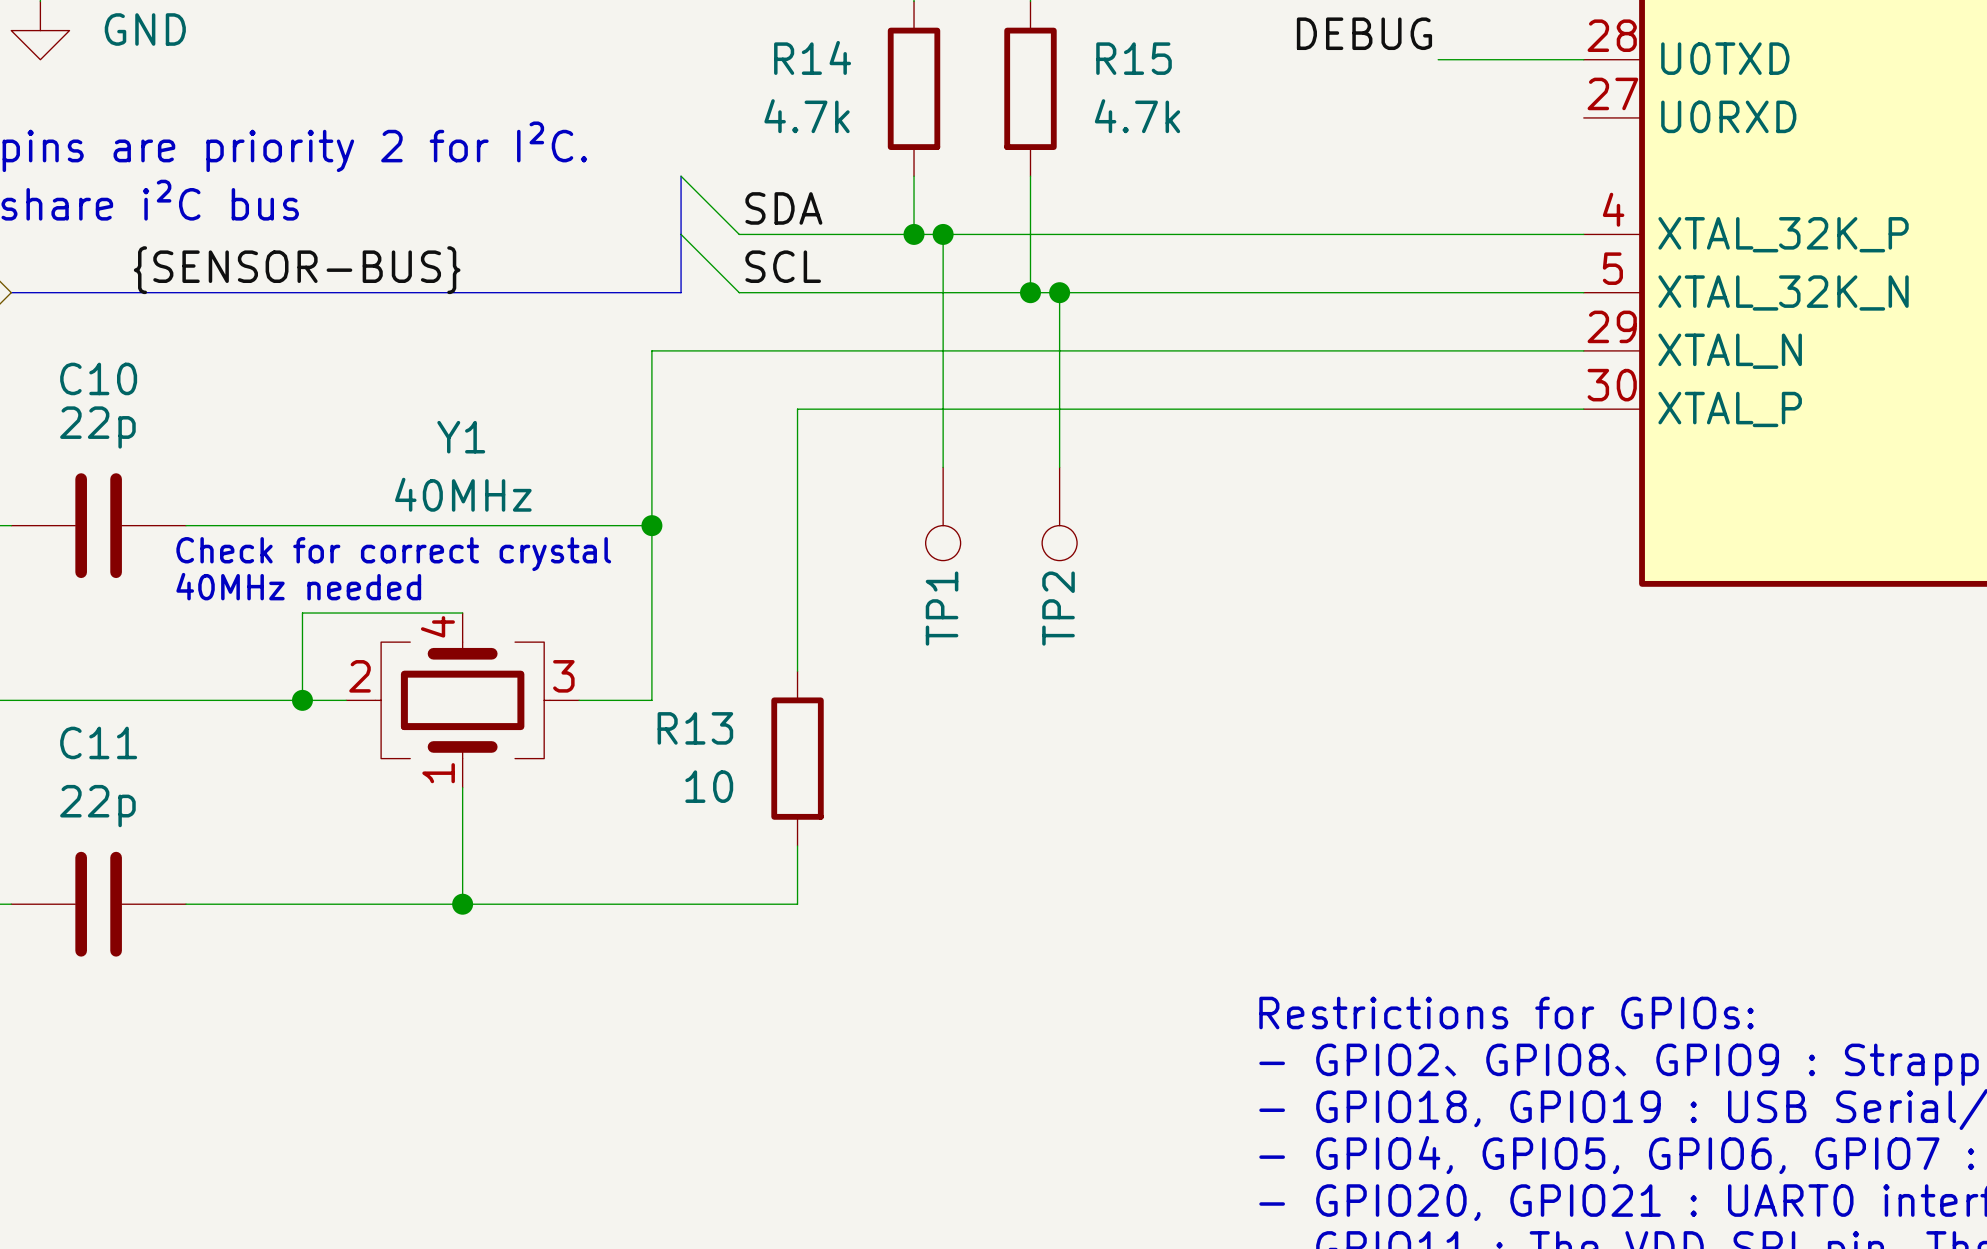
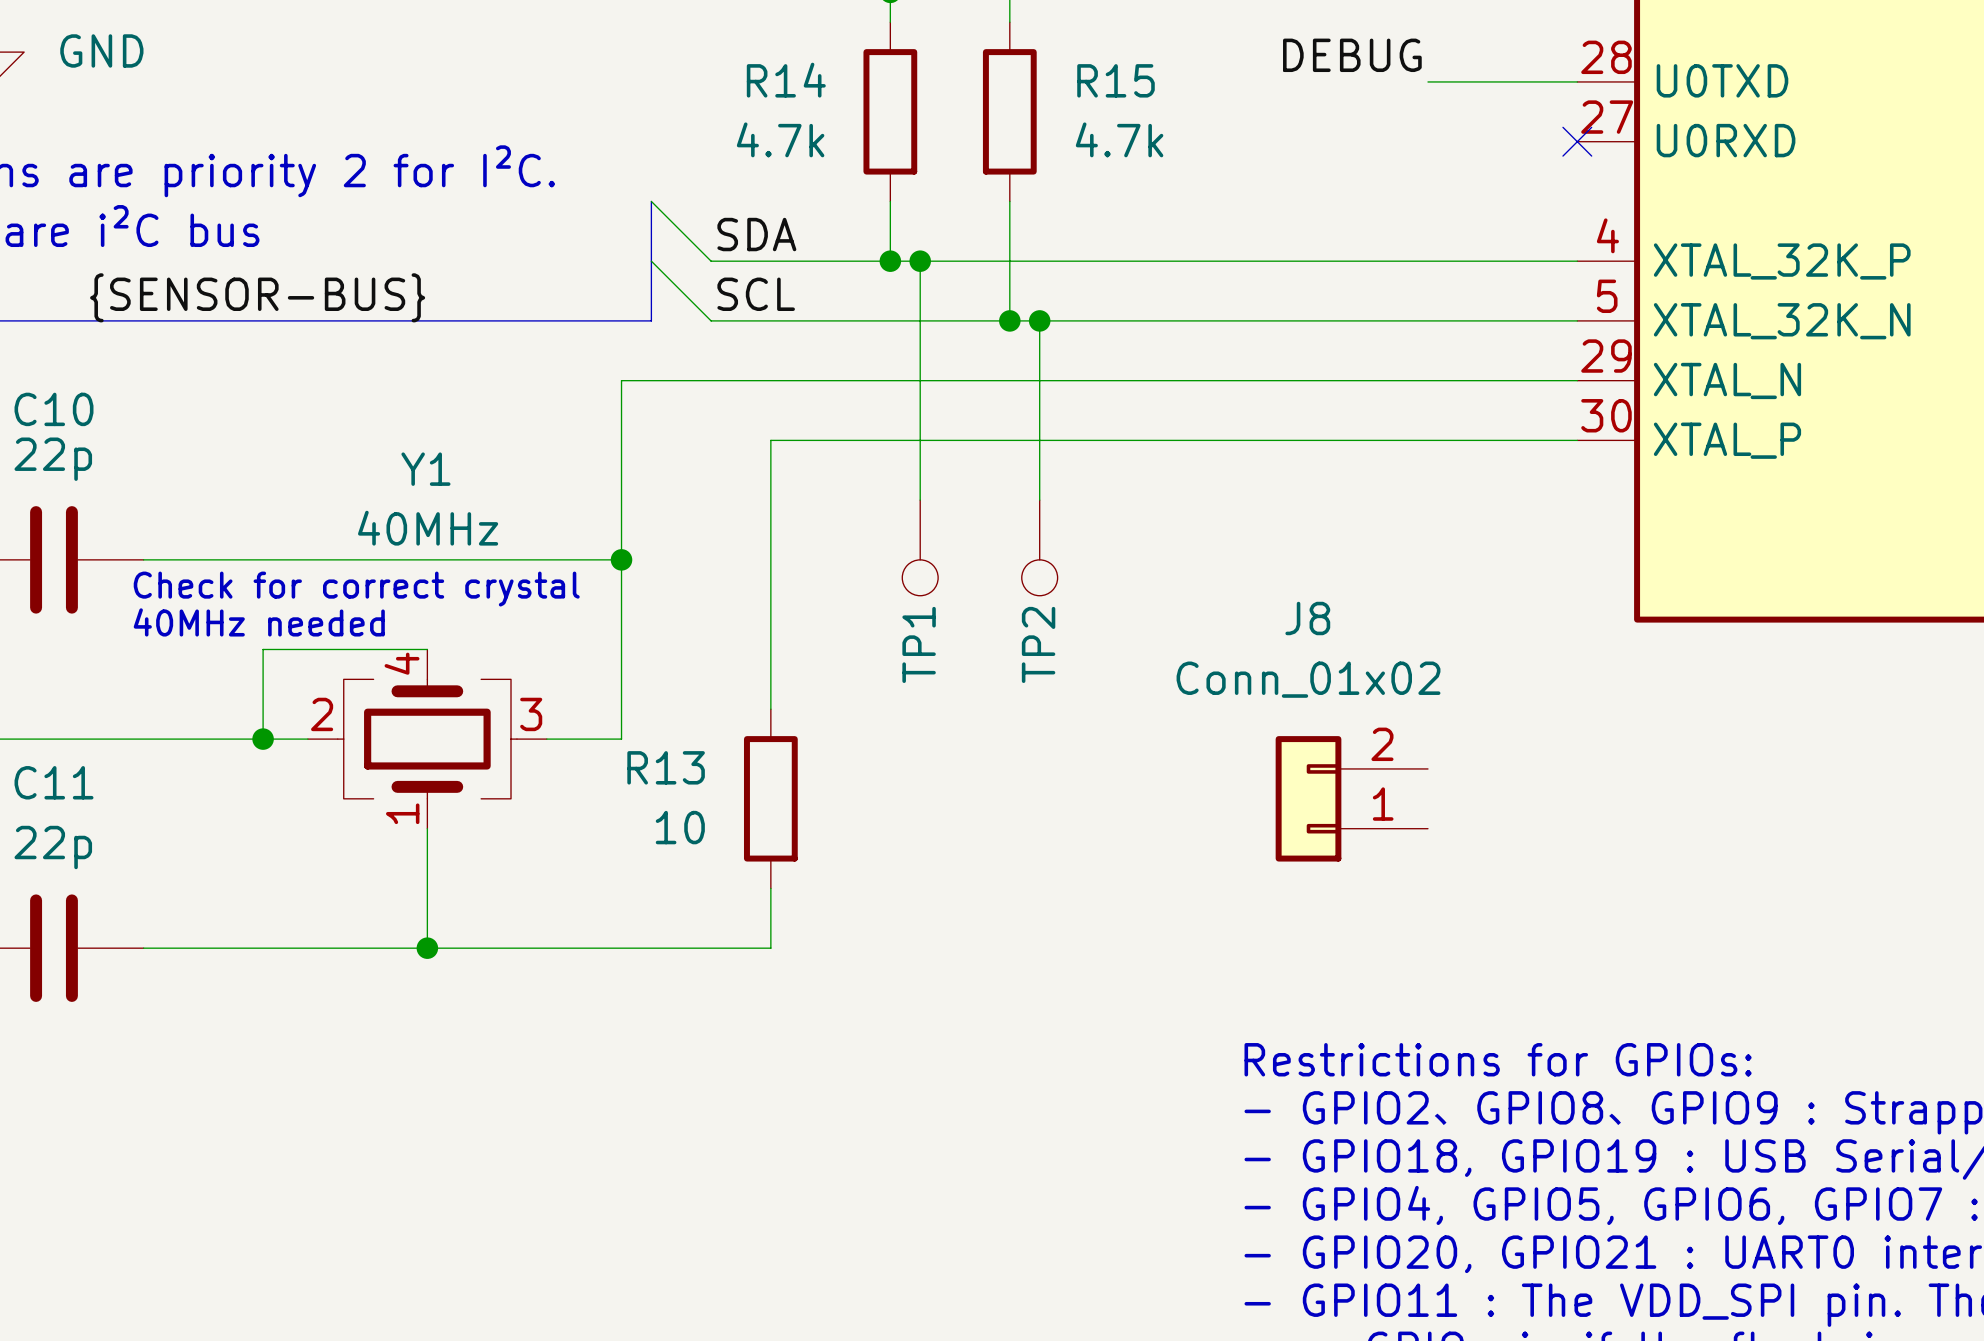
no-connect mark: none -> (1577, 141)
J8: none -> Conn_01x02 (1351, 798)

